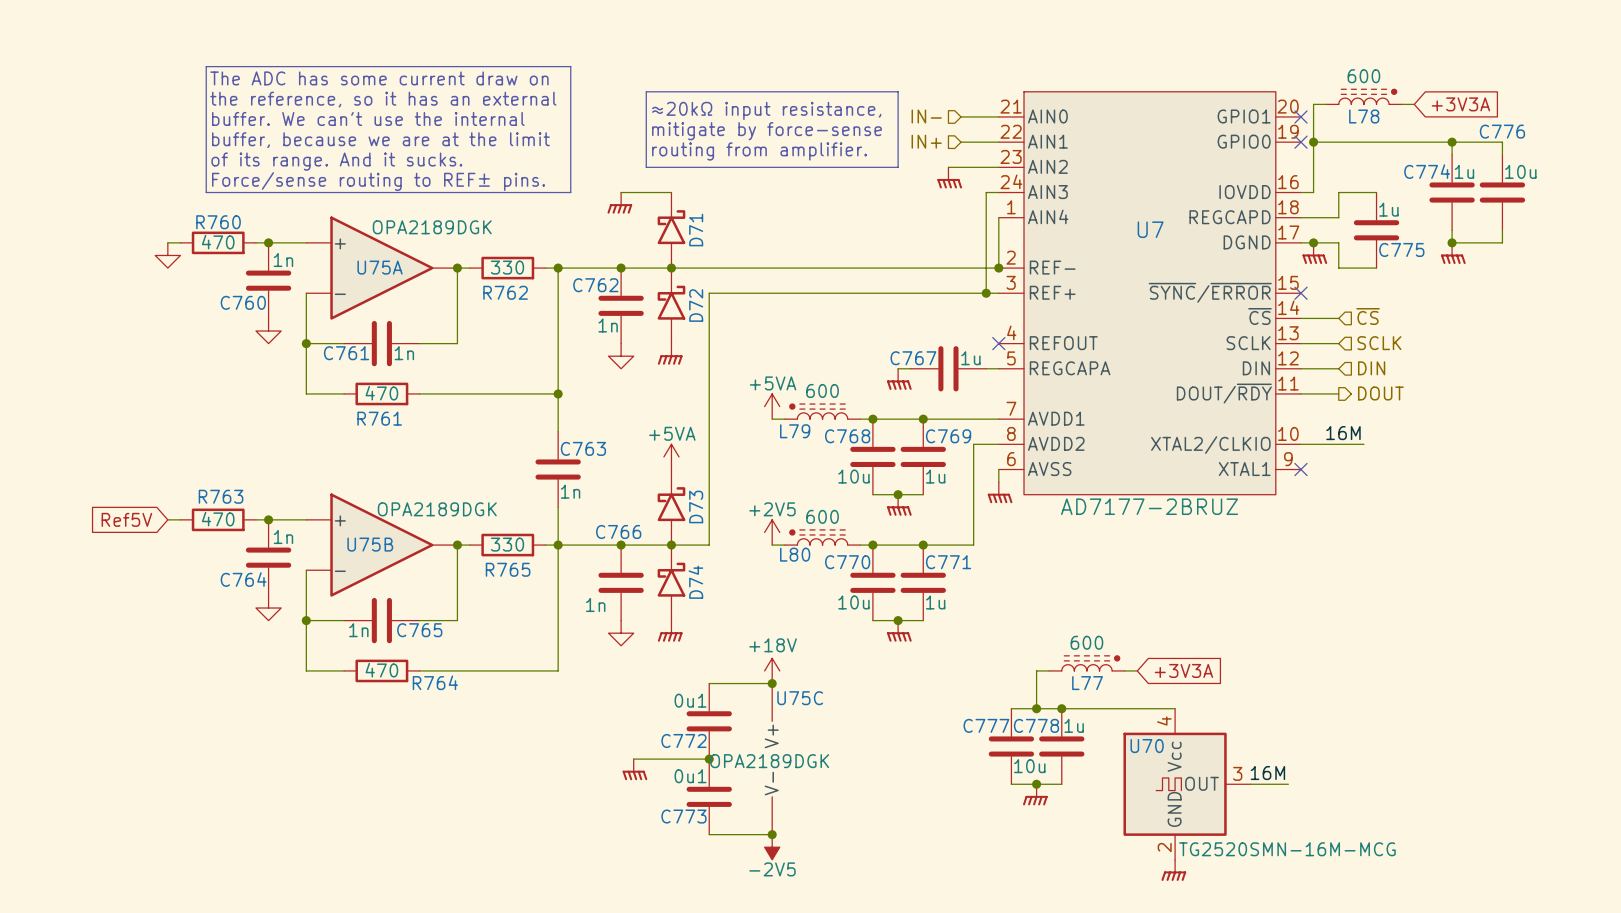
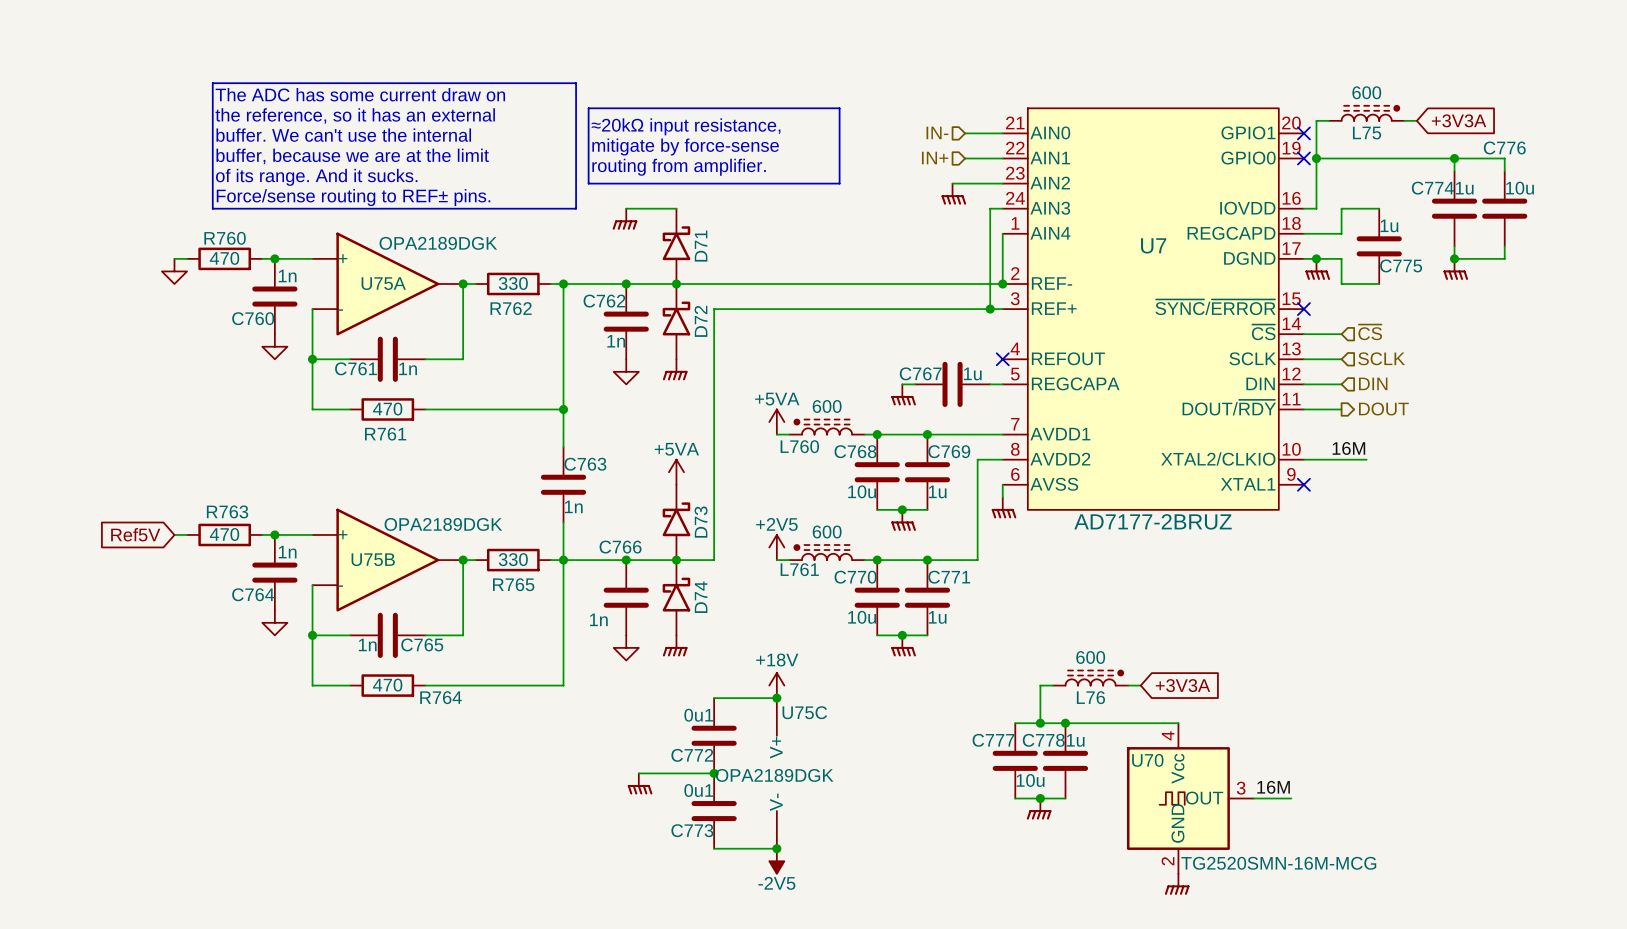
line: (646, 91) (646, 167) -> (651, 108) (588, 108) (588, 183) (651, 183)
line: (835, 91) (898, 91) (898, 167) (835, 167) -> (839, 108) (839, 183)
text position: ≈20kΩ input resistance, (766, 110) -> ≈20kΩ input resistance, (686, 126)
L78 name: L78 (1364, 116) -> L75 (1367, 133)
text position: mitigate by force-sense (767, 131) -> mitigate by force-sense (685, 147)
text position: routing from amplifier. (759, 151) -> routing from amplifier. (679, 167)
L79 name: L79 (795, 431) -> L760 (799, 446)
L80 name: L80 (795, 554) -> L761 (799, 569)
L77 name: L77 (1087, 683) -> L76 (1090, 697)

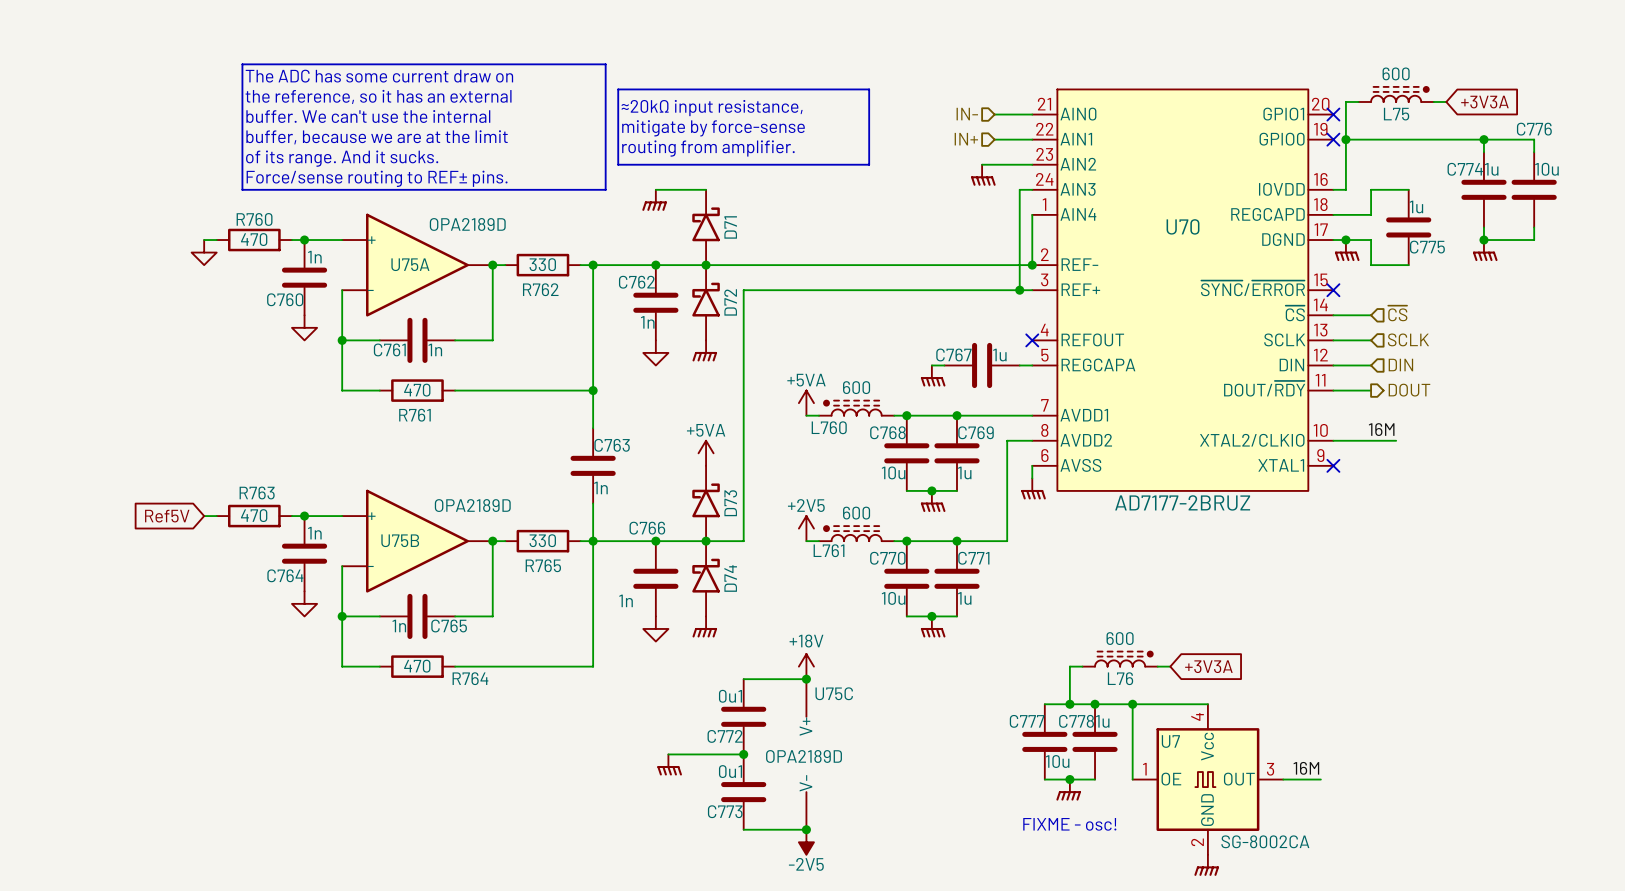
U75A value: OPA2189DGK (438, 243) -> OPA2189D (467, 224)
U7 name: U7 (1153, 245) -> U70 (1183, 226)
U75B value: OPA2189DGK (443, 524) -> OPA2189D (472, 505)
wire: none -> (1132, 704) (1132, 779)
junction: none -> (1132, 704)
U75C value: OPA2189DGK (774, 775) -> OPA2189D (804, 756)
U7: none -> SG-8002CA (1207, 779)
U70: TG2520SMN-16M-MCG (1190, 798) -> none
text: none -> FIXME - osc! (1069, 824)

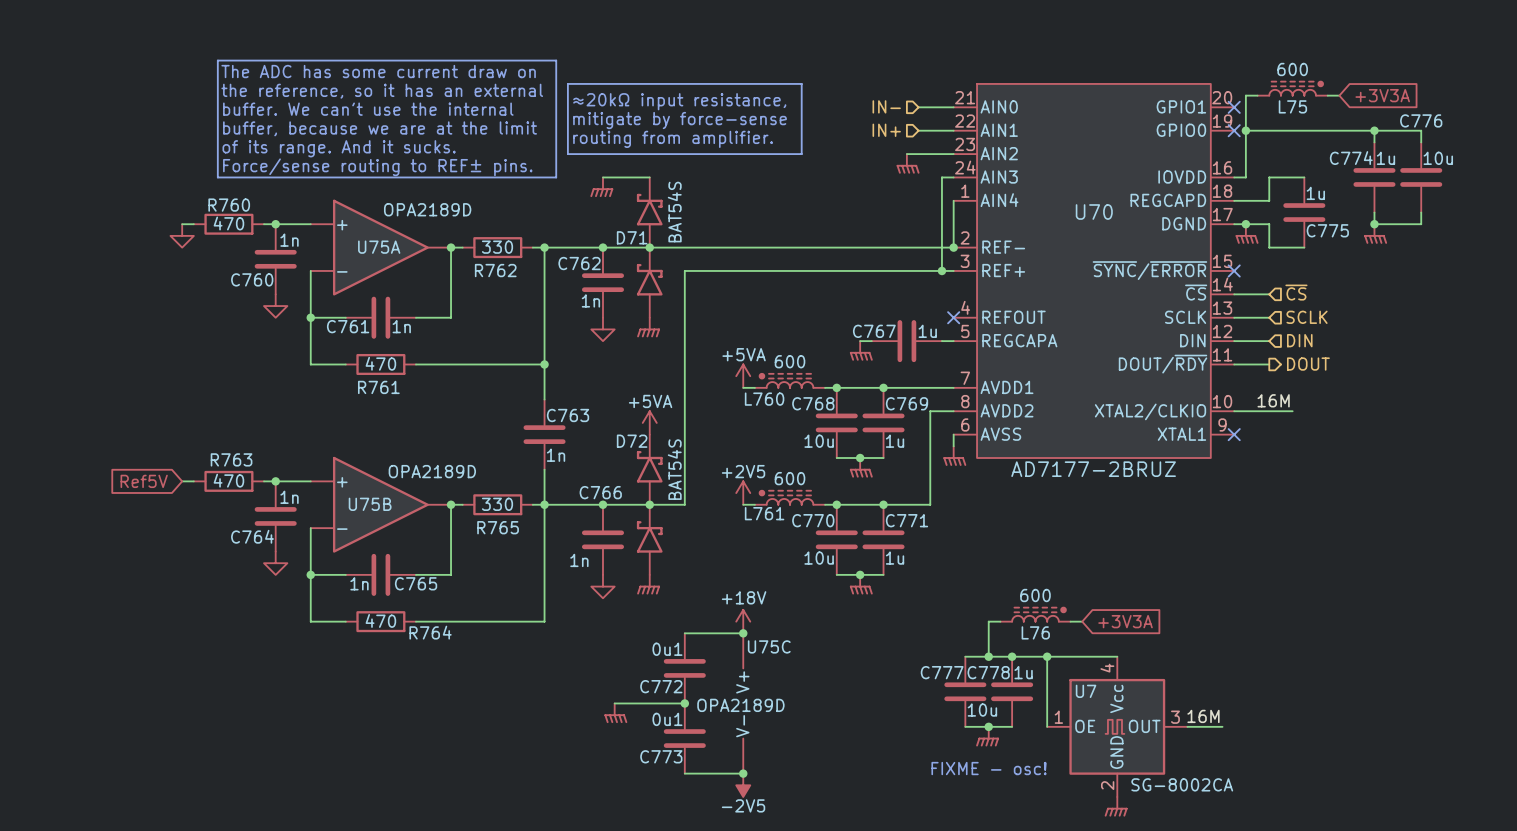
D71 symbol: [692, 189, 720, 266] -> [636, 177, 663, 318]
D71 name position: D71 (730, 227) -> D71 (632, 237)
D71 value: none -> BAT54S (674, 212)
D72 symbol: [692, 265, 720, 341] -> [636, 434, 663, 575]
D72 name position: D72 (730, 302) -> D72 (632, 441)
D72 value: none -> BAT54S (674, 469)
D73: (706, 503) -> none
D74: (706, 578) -> none

